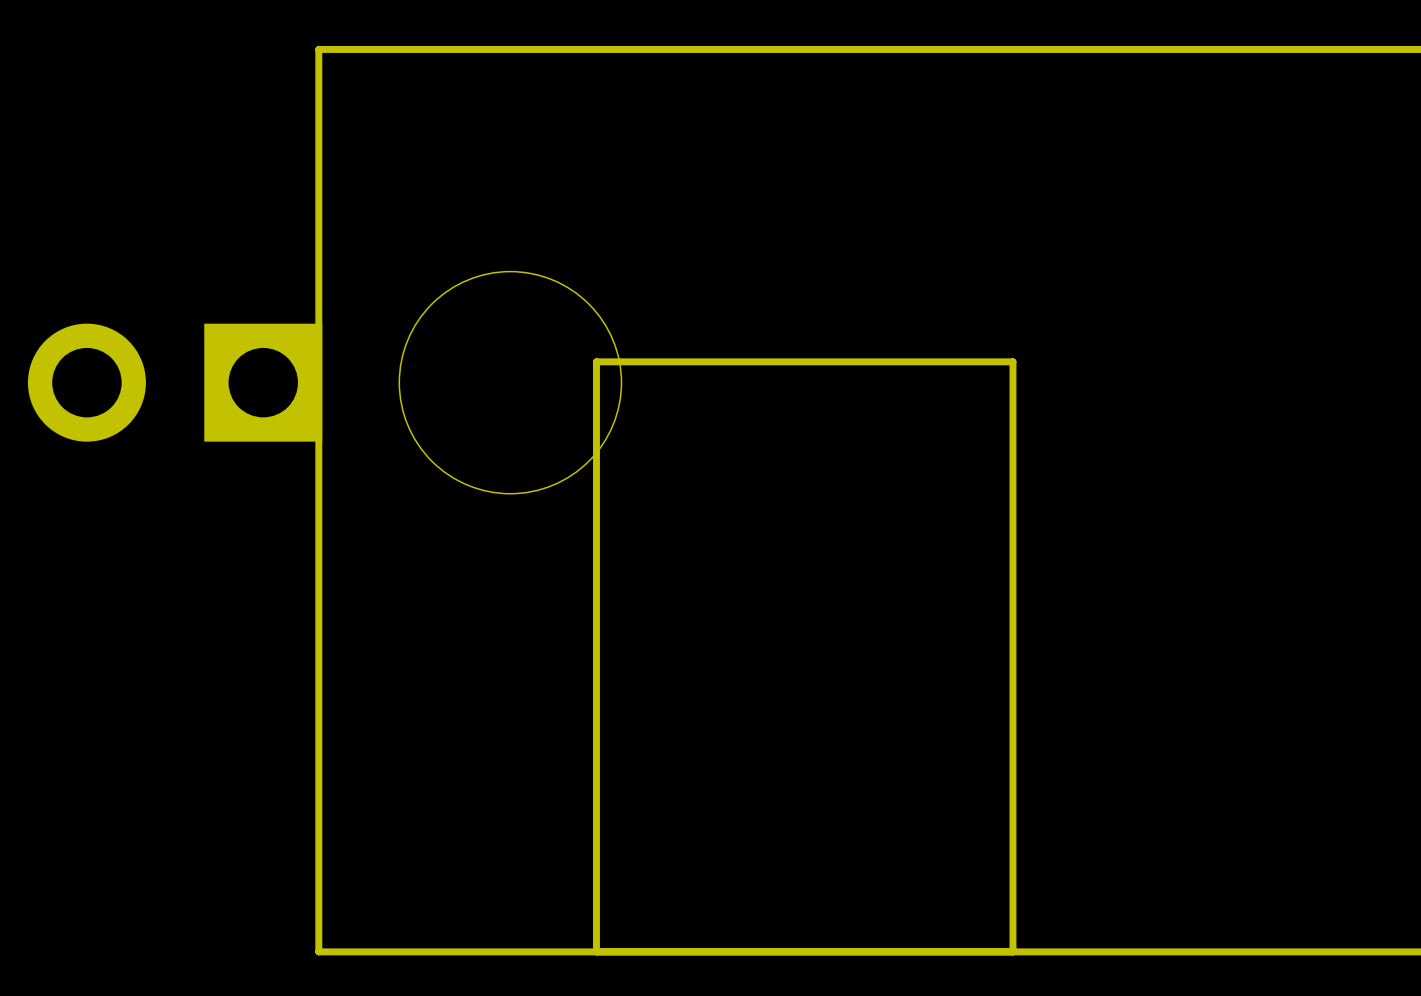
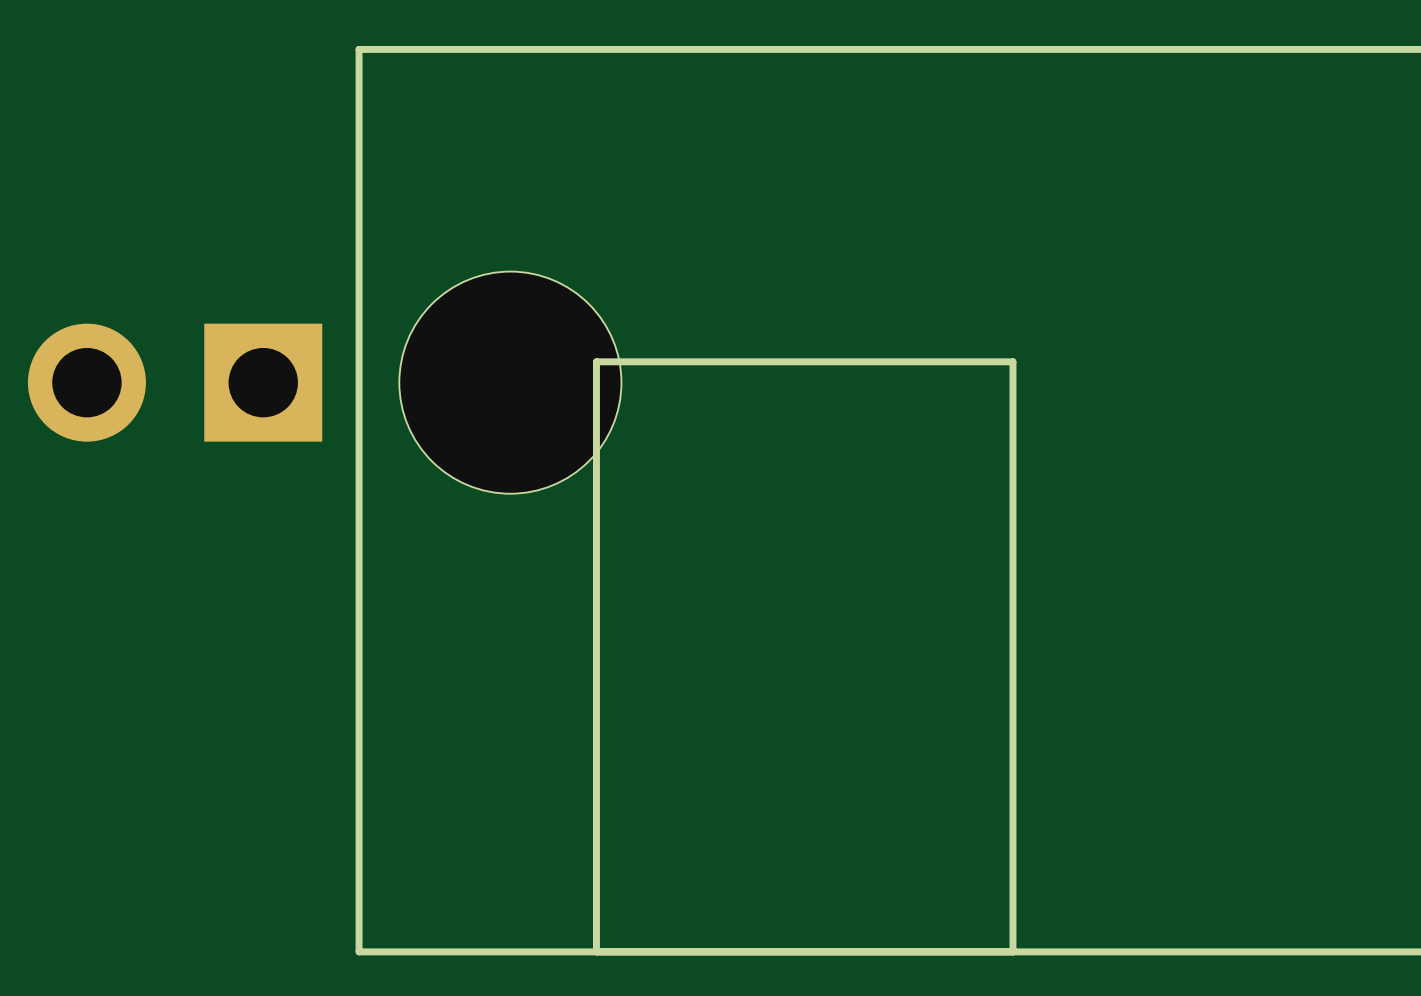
board edge: (359, 49) (318, 49) (318, 951) (359, 951) -> (359, 49) (359, 951)

